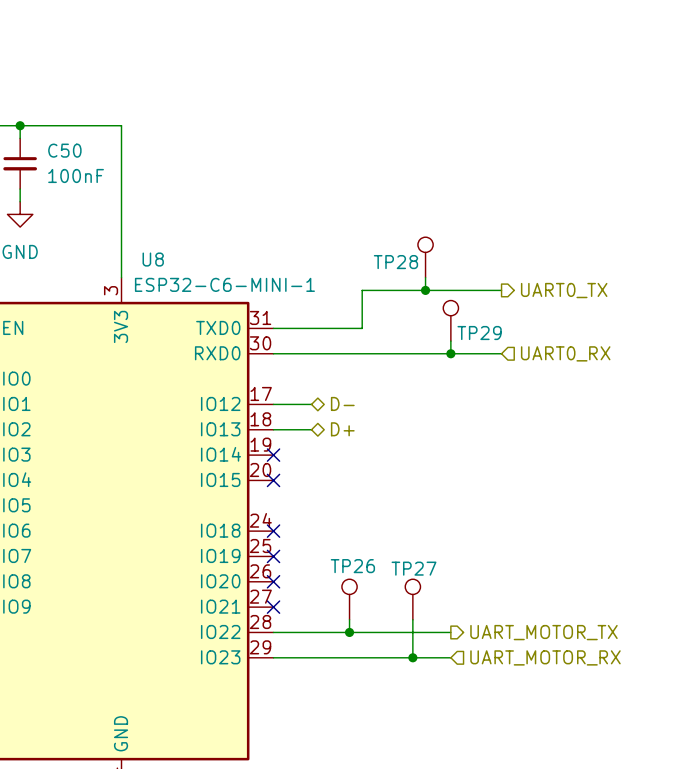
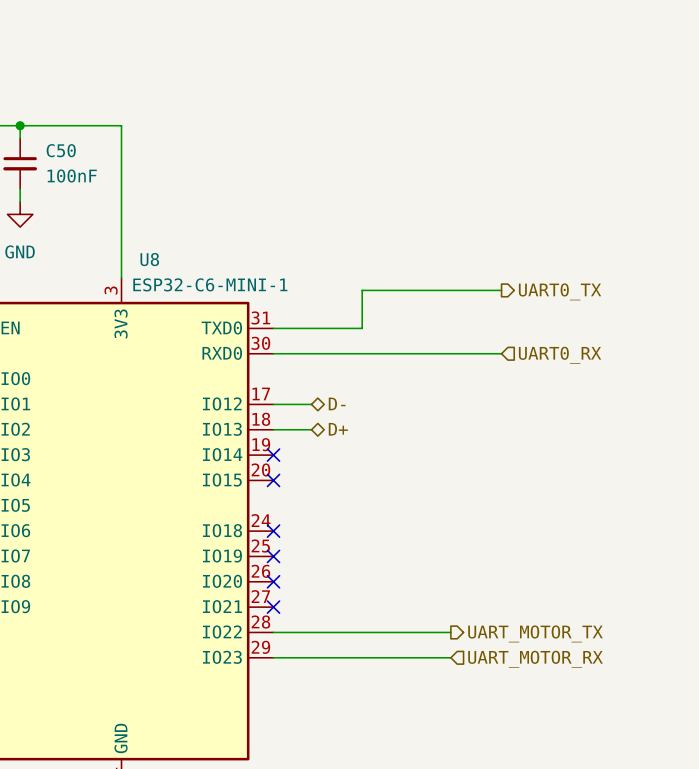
TP28: (425, 257) -> none
wire: (425, 277) (425, 290) -> none
junction: (425, 290) -> none
TP29: (450, 320) -> none
wire: (450, 341) (450, 353) -> none
junction: (450, 353) -> none
TP26: (349, 599) -> none
TP27: (412, 599) -> none
wire: (349, 619) (349, 632) -> none
wire: (412, 619) (412, 657) -> none
junction: (349, 632) -> none
junction: (412, 657) -> none

